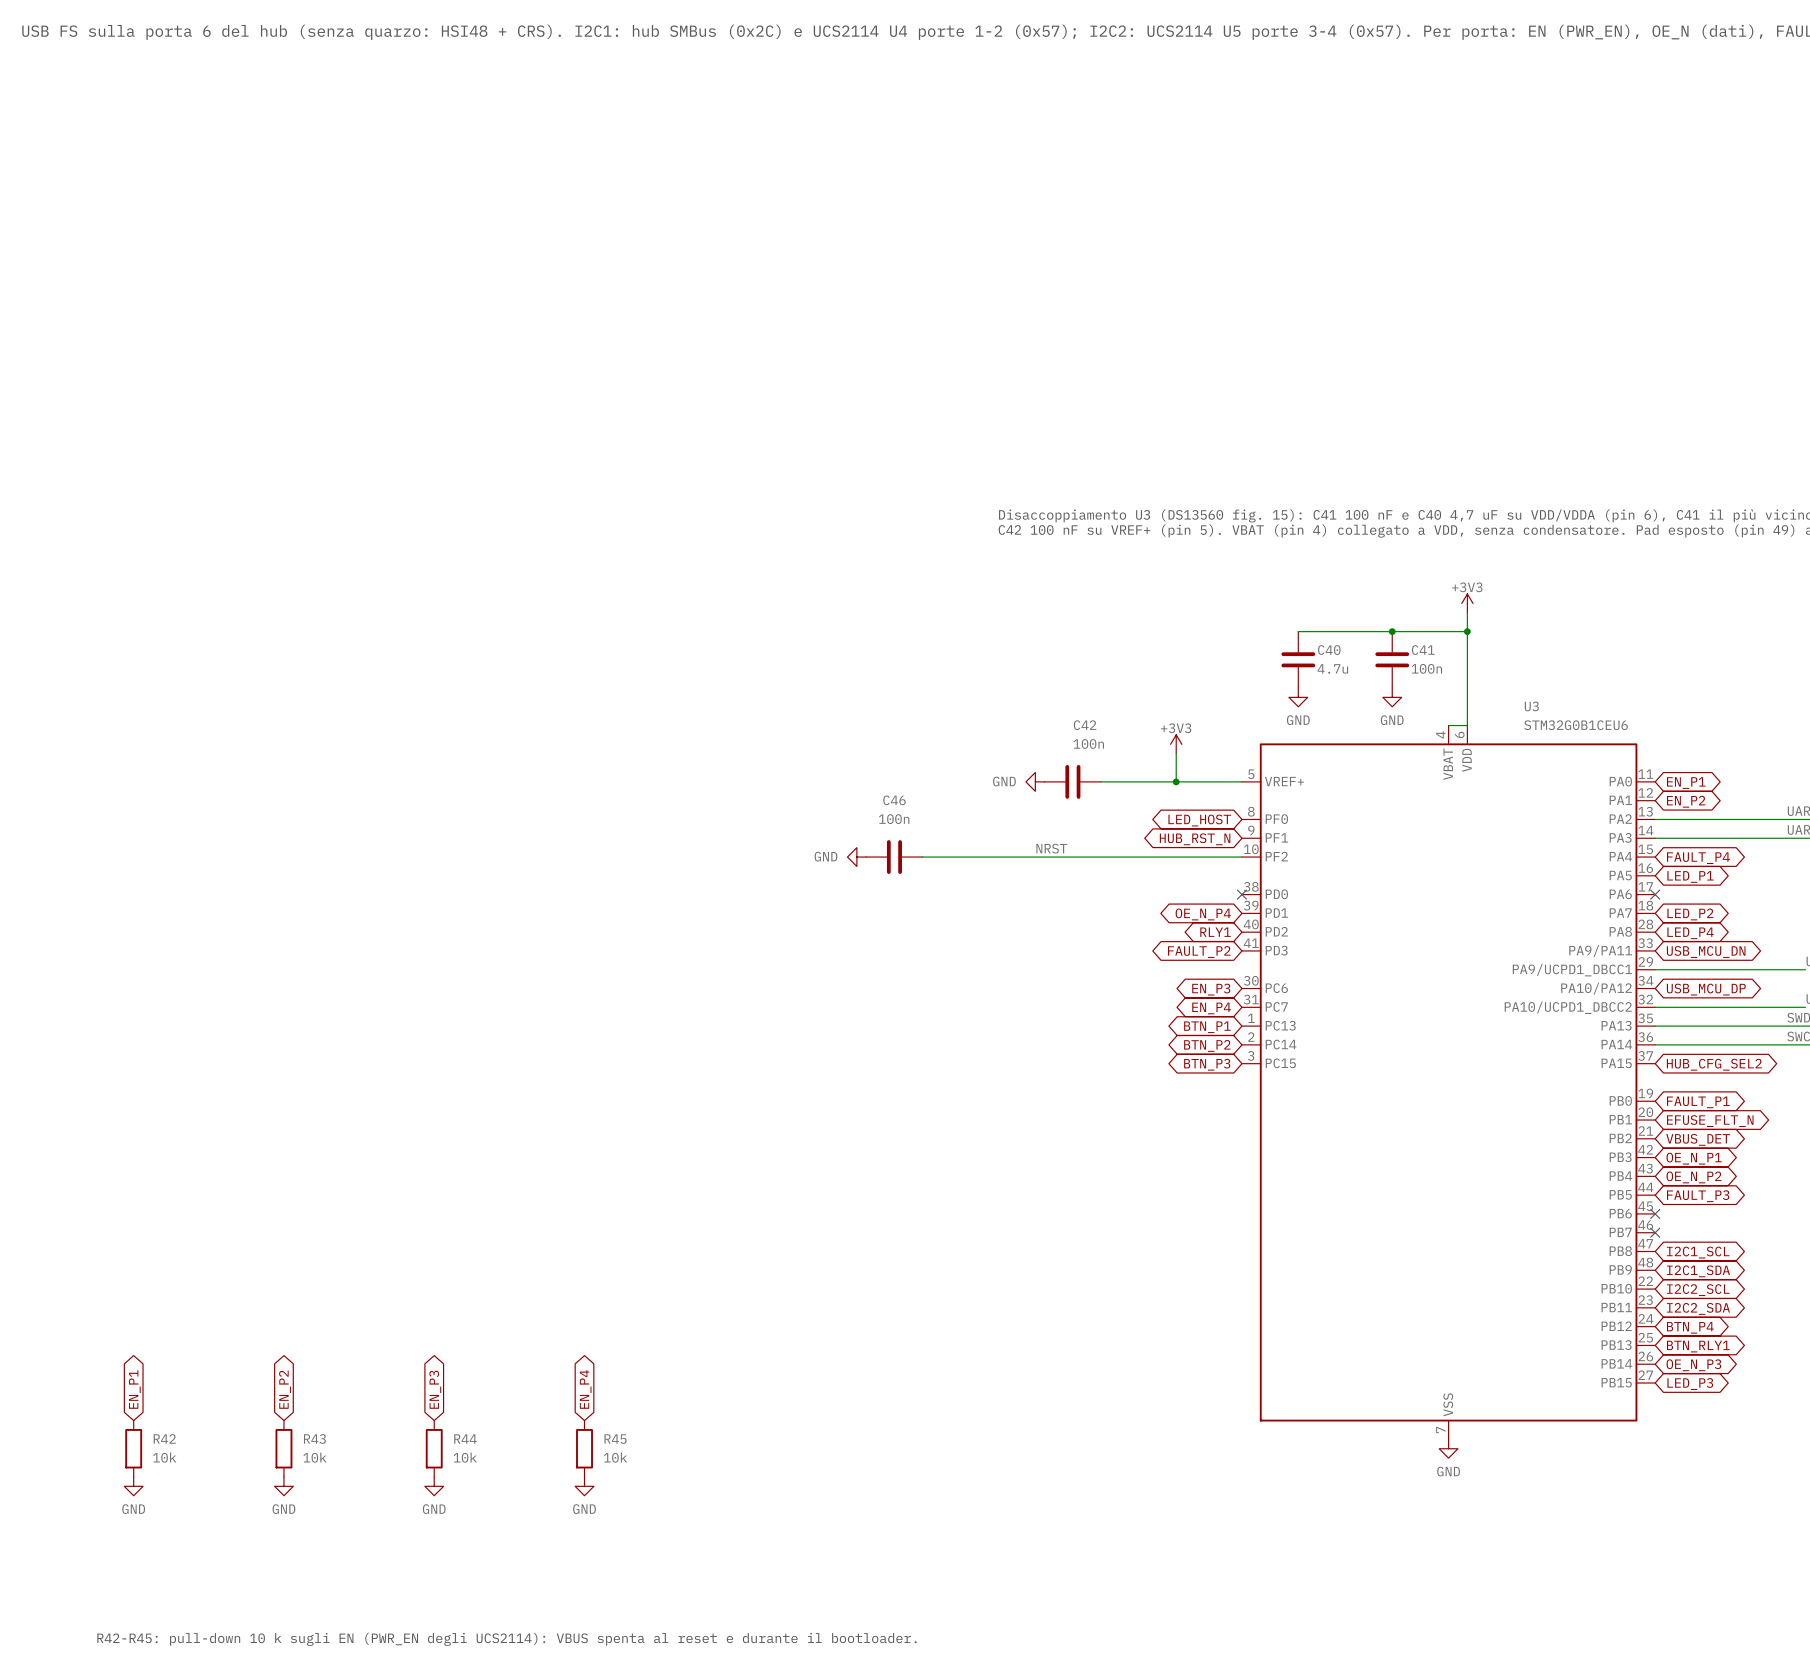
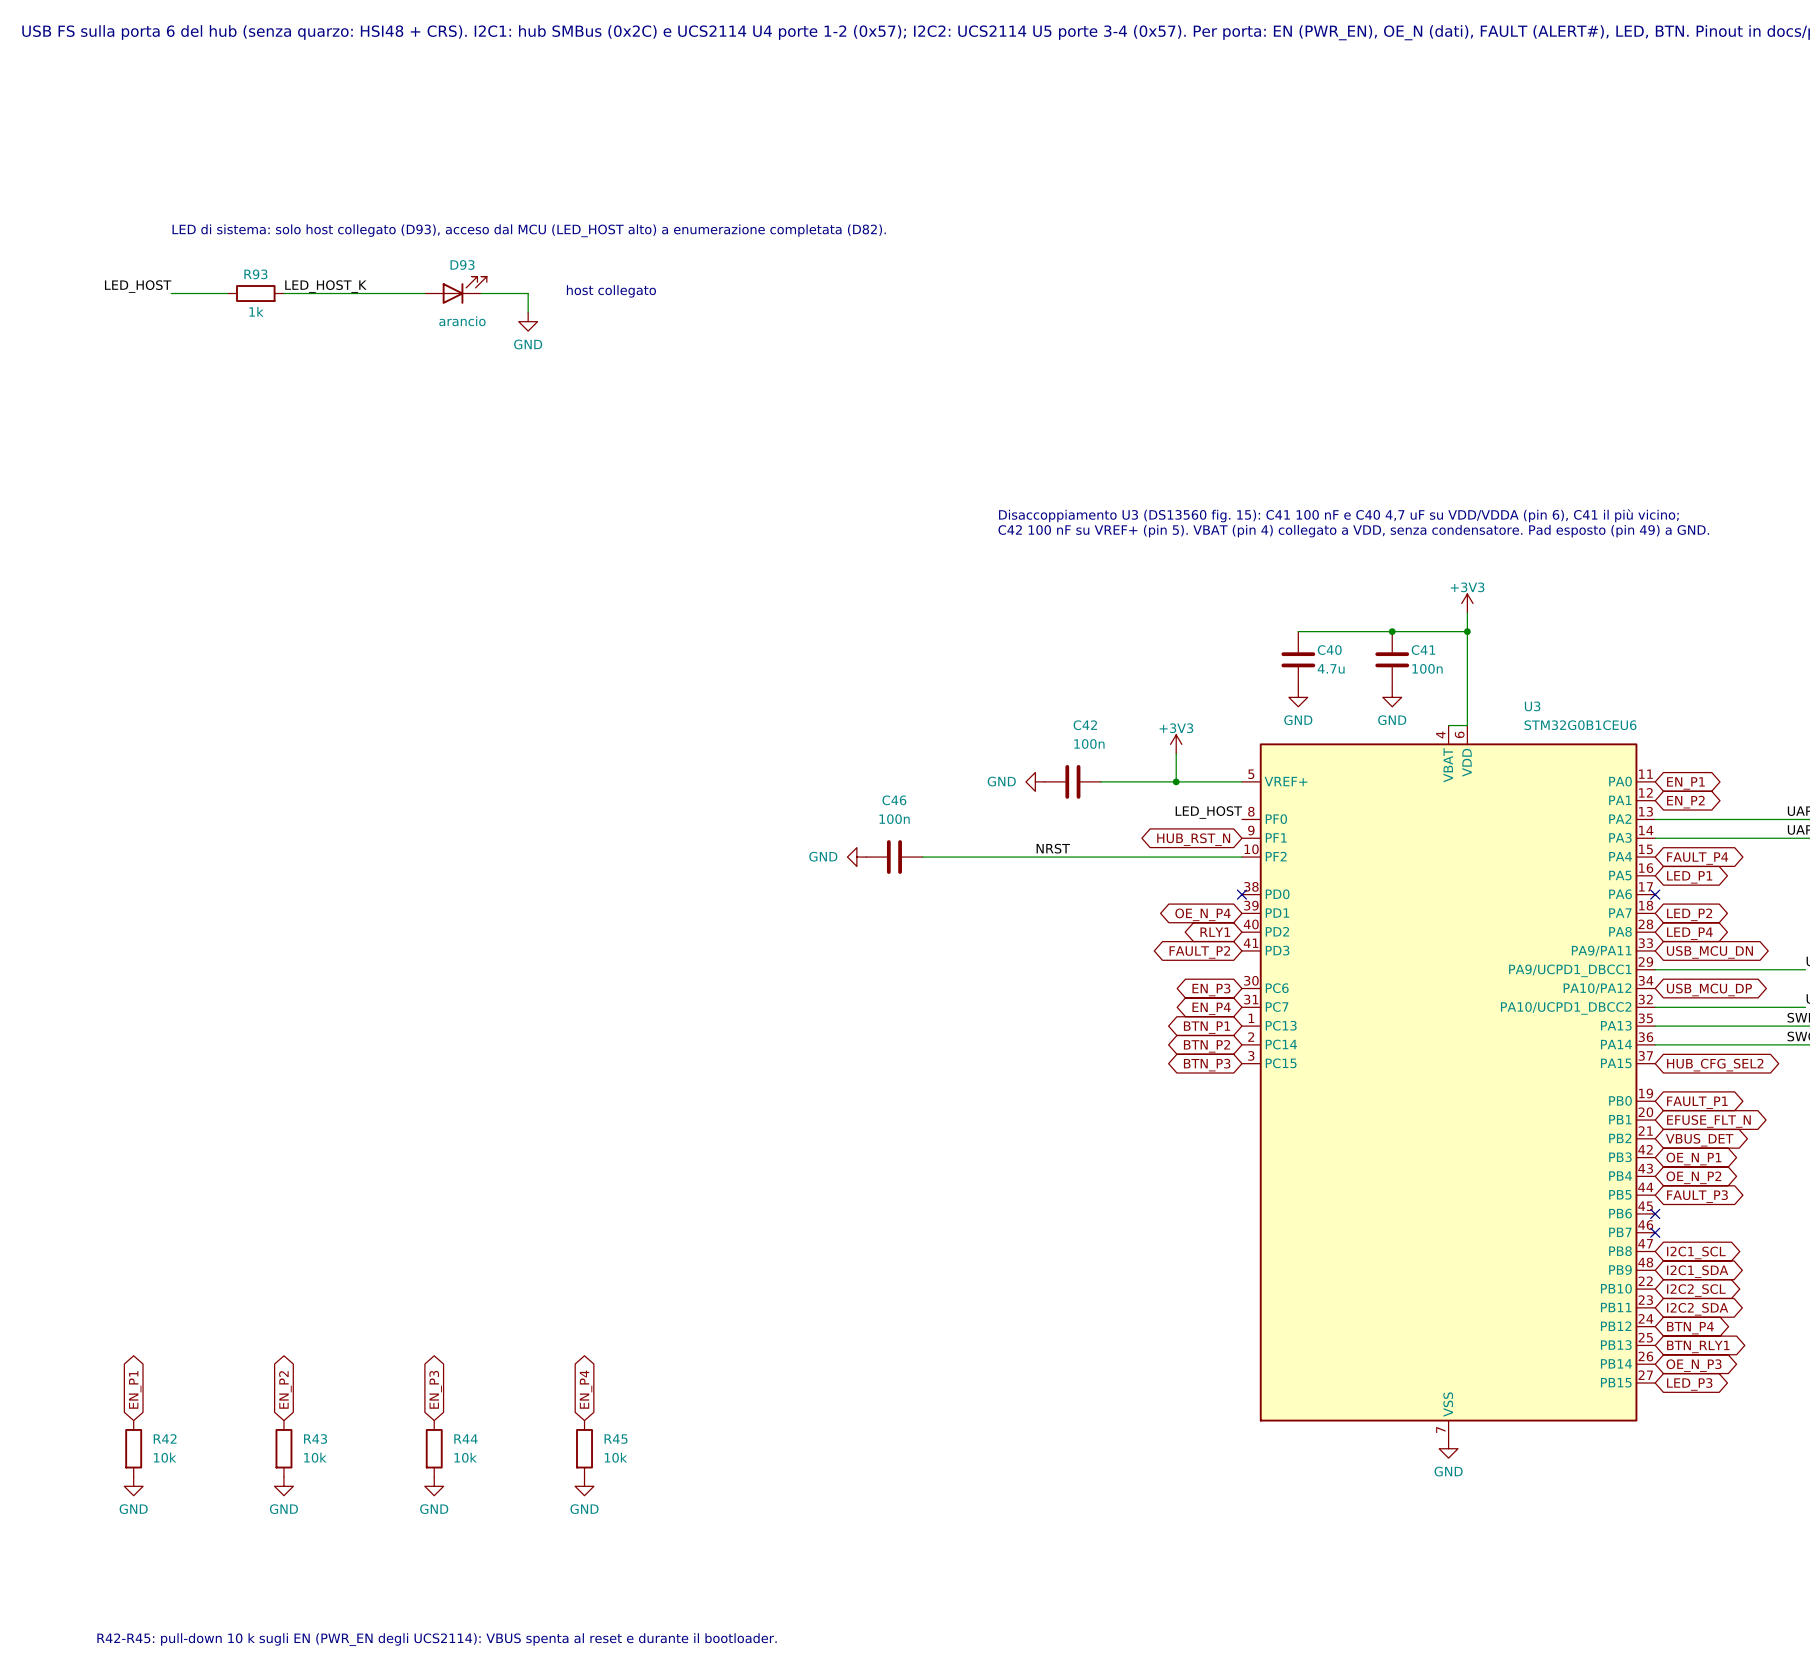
text: none -> LED di sistema: solo host collegato (D93), acceso dal MCU (LED_HOST alto) a enumerazione completata (D82). (529, 230)
label: none -> LED_HOST (138, 286)
label: none -> LED_HOST_K (325, 286)
D93: none -> arancio (455, 290)
text: none -> host collegato (611, 291)
wire: none -> (171, 293) (227, 293)
R93: none -> 1k (255, 293)
wire: none -> (283, 293) (424, 293)
wire: none -> (481, 293) (528, 293) (528, 312)
power symbol: none -> GND (528, 321)
label: none -> LED_HOST (1208, 812)
global label: LED_HOST (1199, 820) -> none

